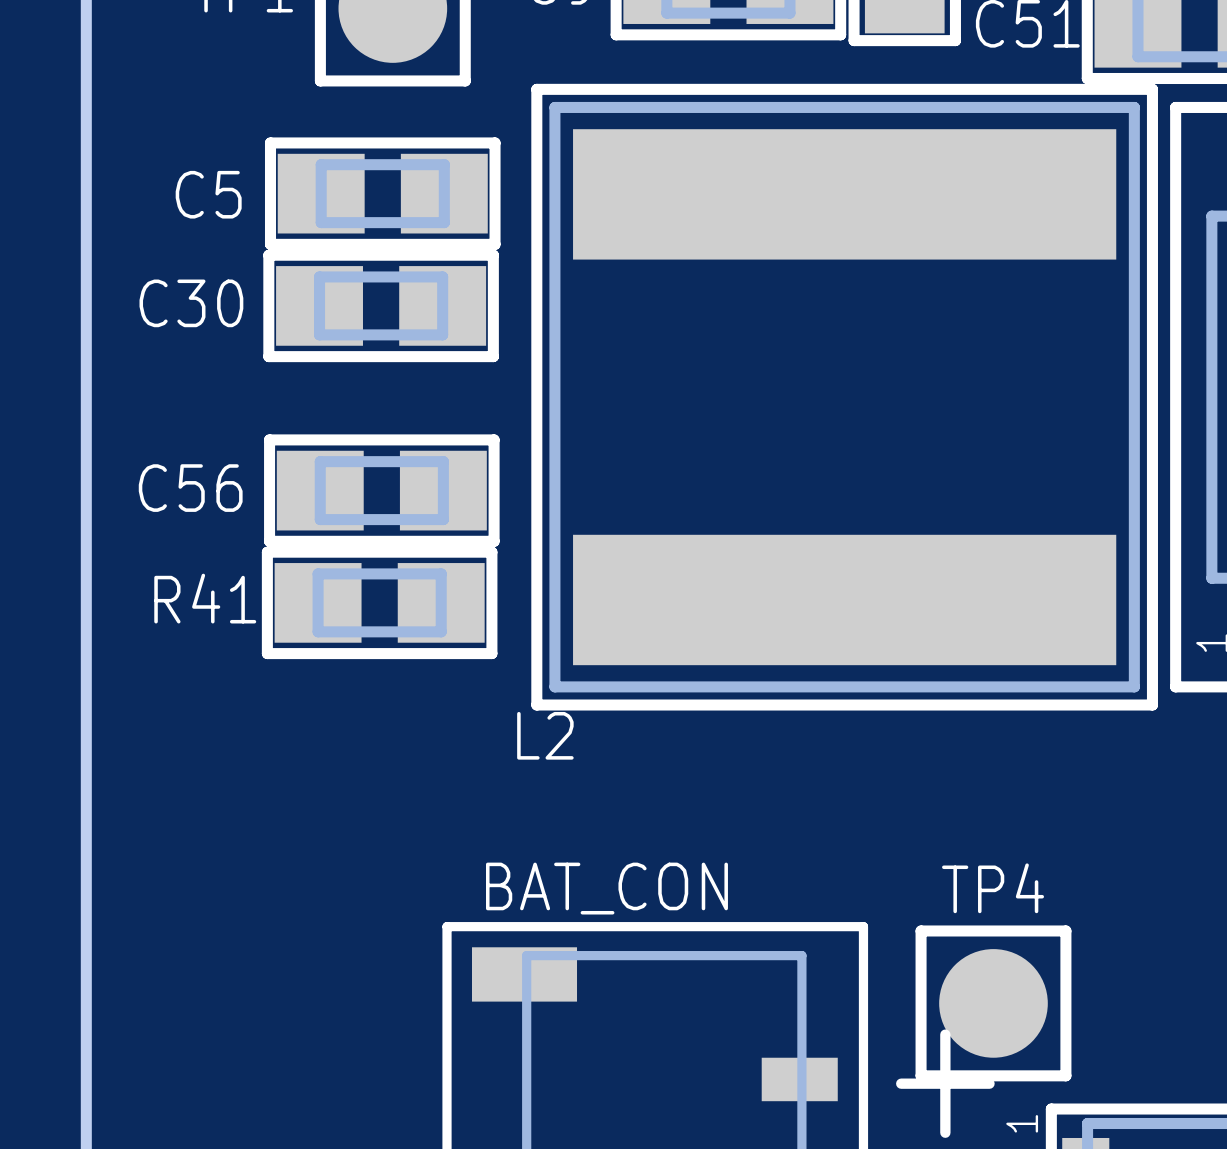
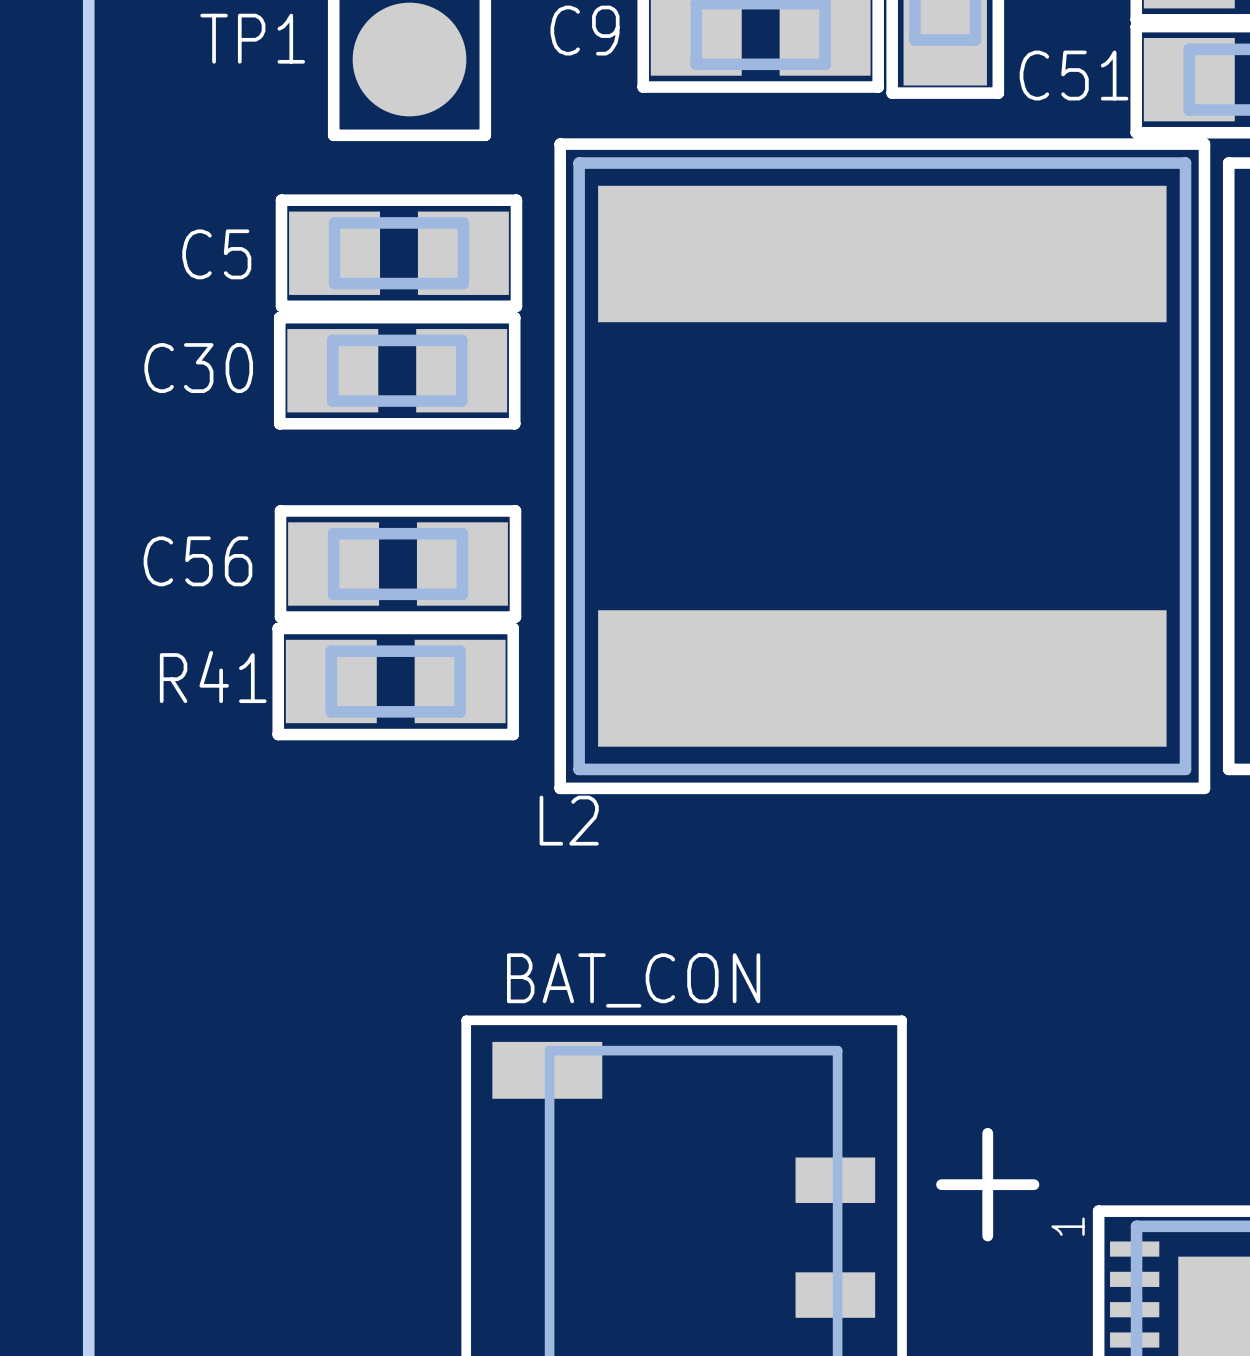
TP4: (993, 1003) -> none

